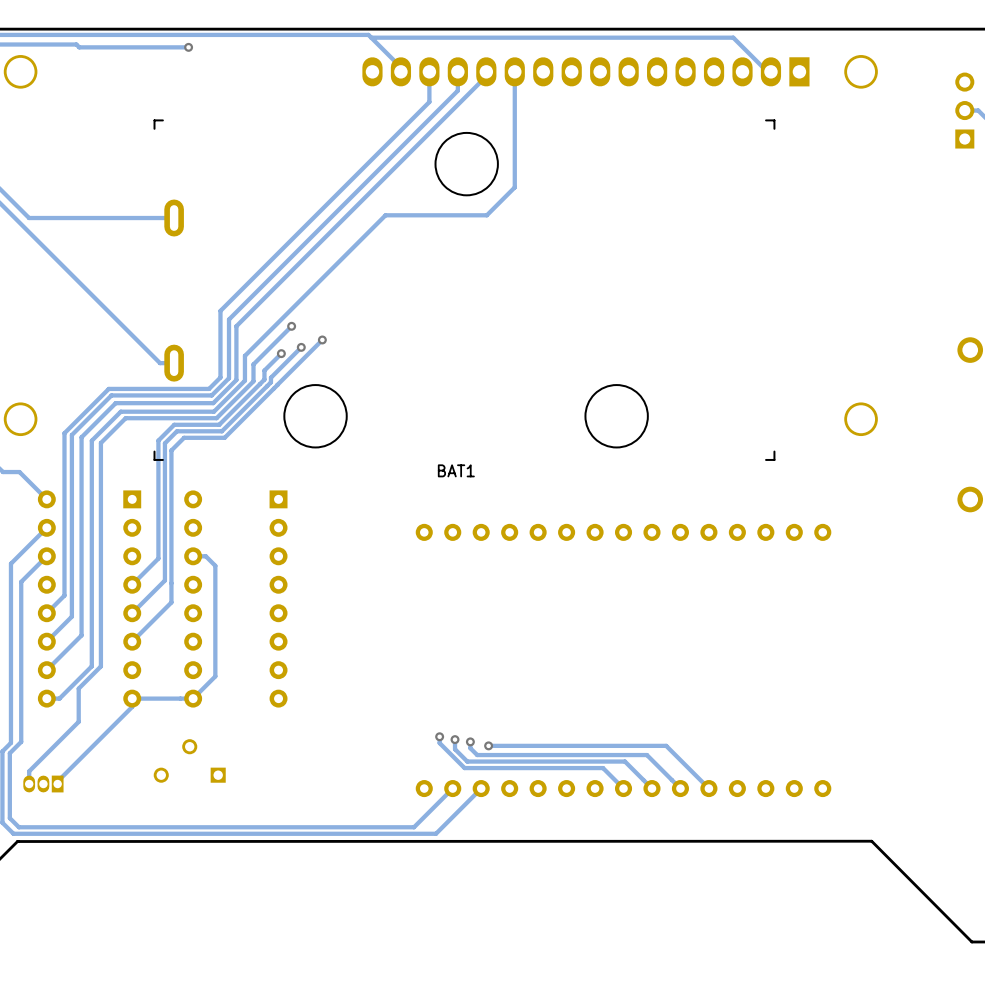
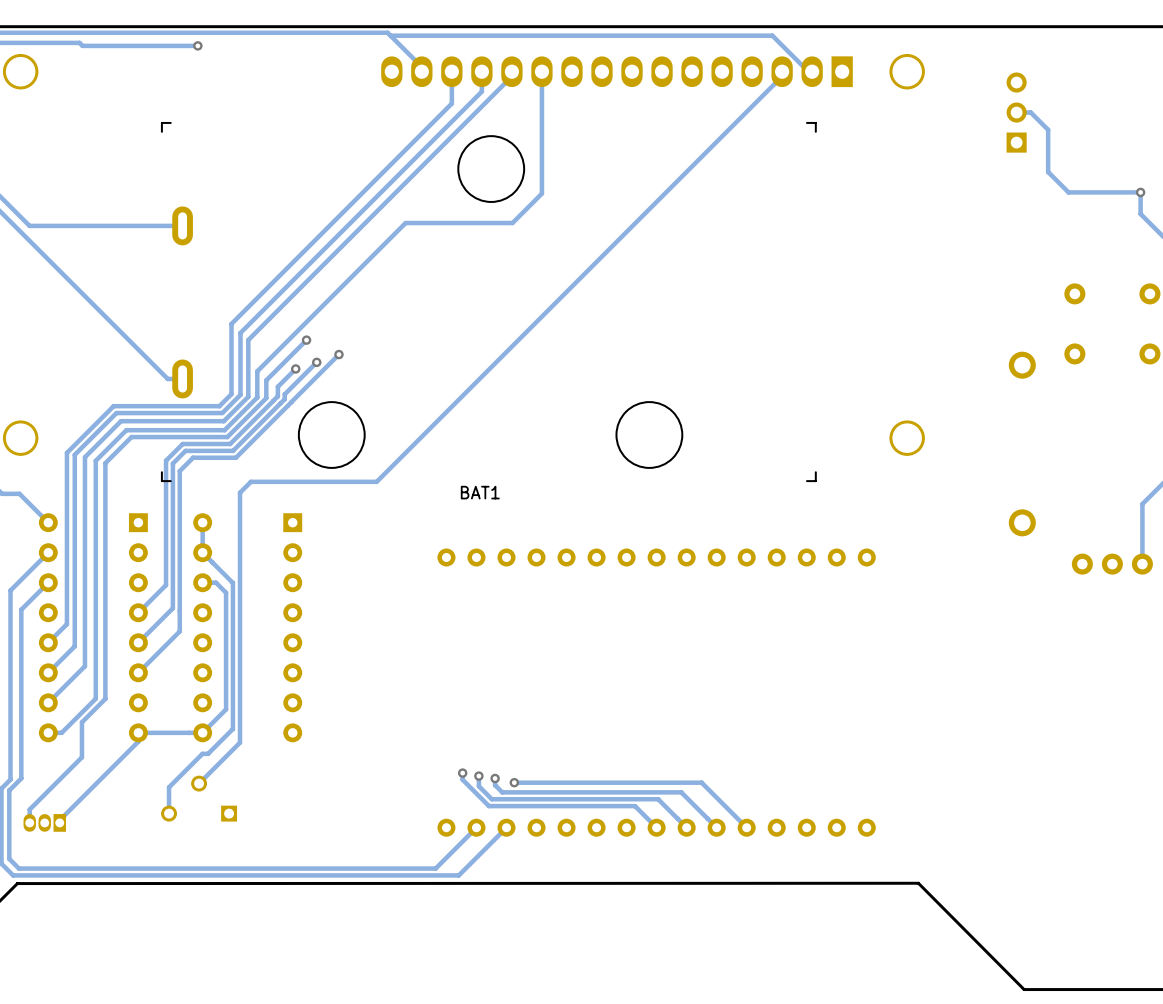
track: none -> (782, 71) (782, 76) (376, 481) (250, 481) (240, 492) (240, 742) (199, 783)
track: none -> (202, 522) (202, 552) (232, 582) (232, 728) (208, 753) (202, 753) (169, 787) (169, 813)

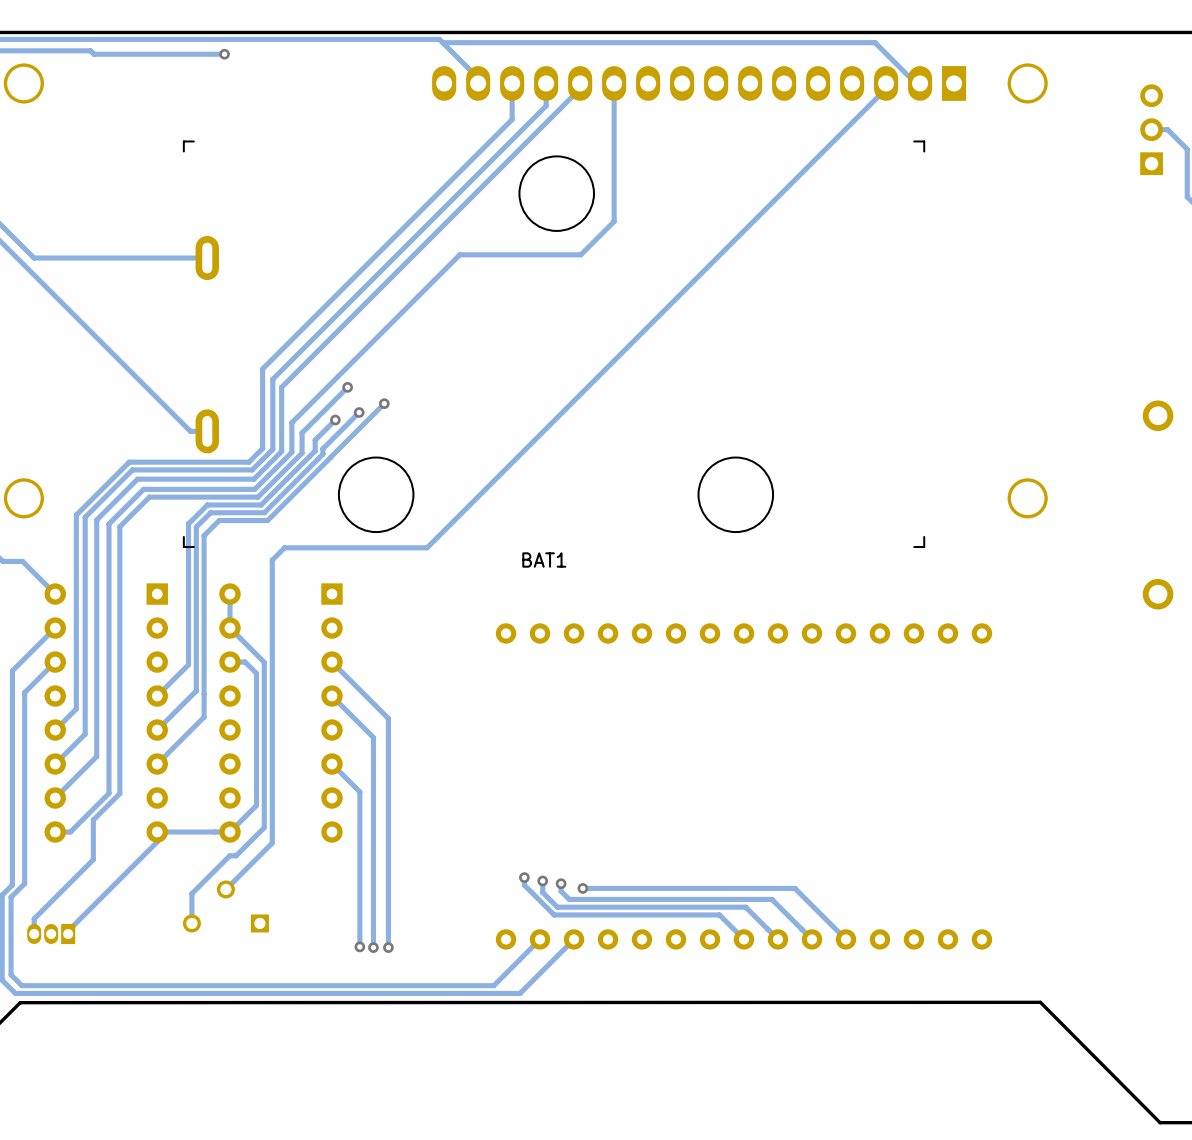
track: none -> (331, 662) (388, 718) (388, 947)
track: none -> (331, 696) (373, 737) (373, 947)
track: none -> (331, 764) (359, 791) (359, 946)
via: none -> (359, 946)
via: none -> (373, 947)
via: none -> (388, 947)

